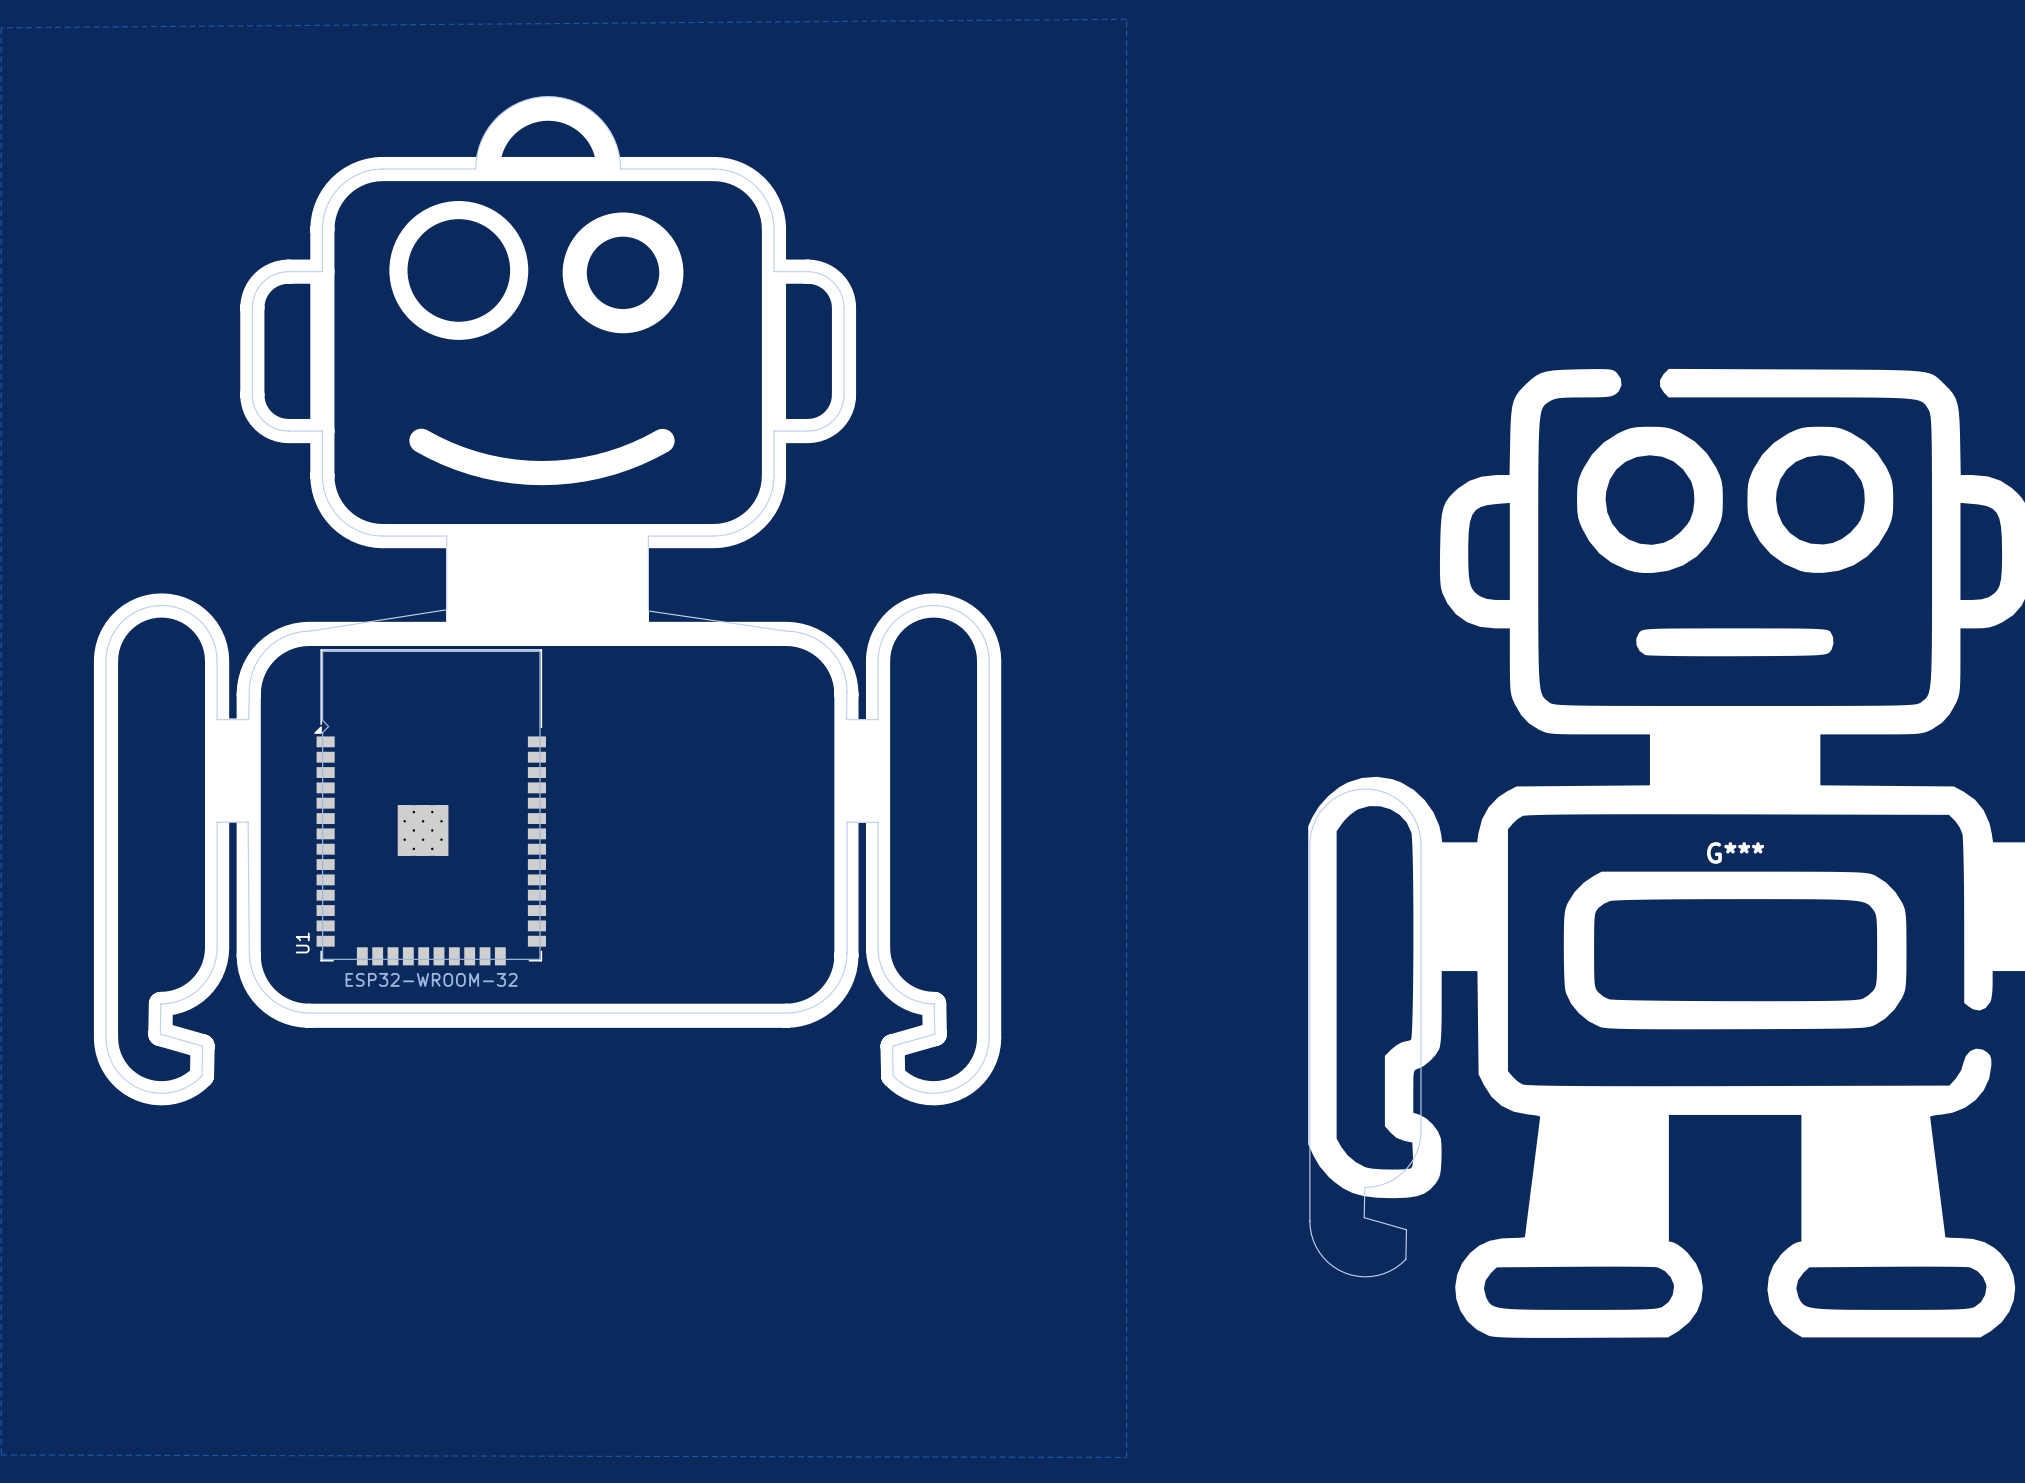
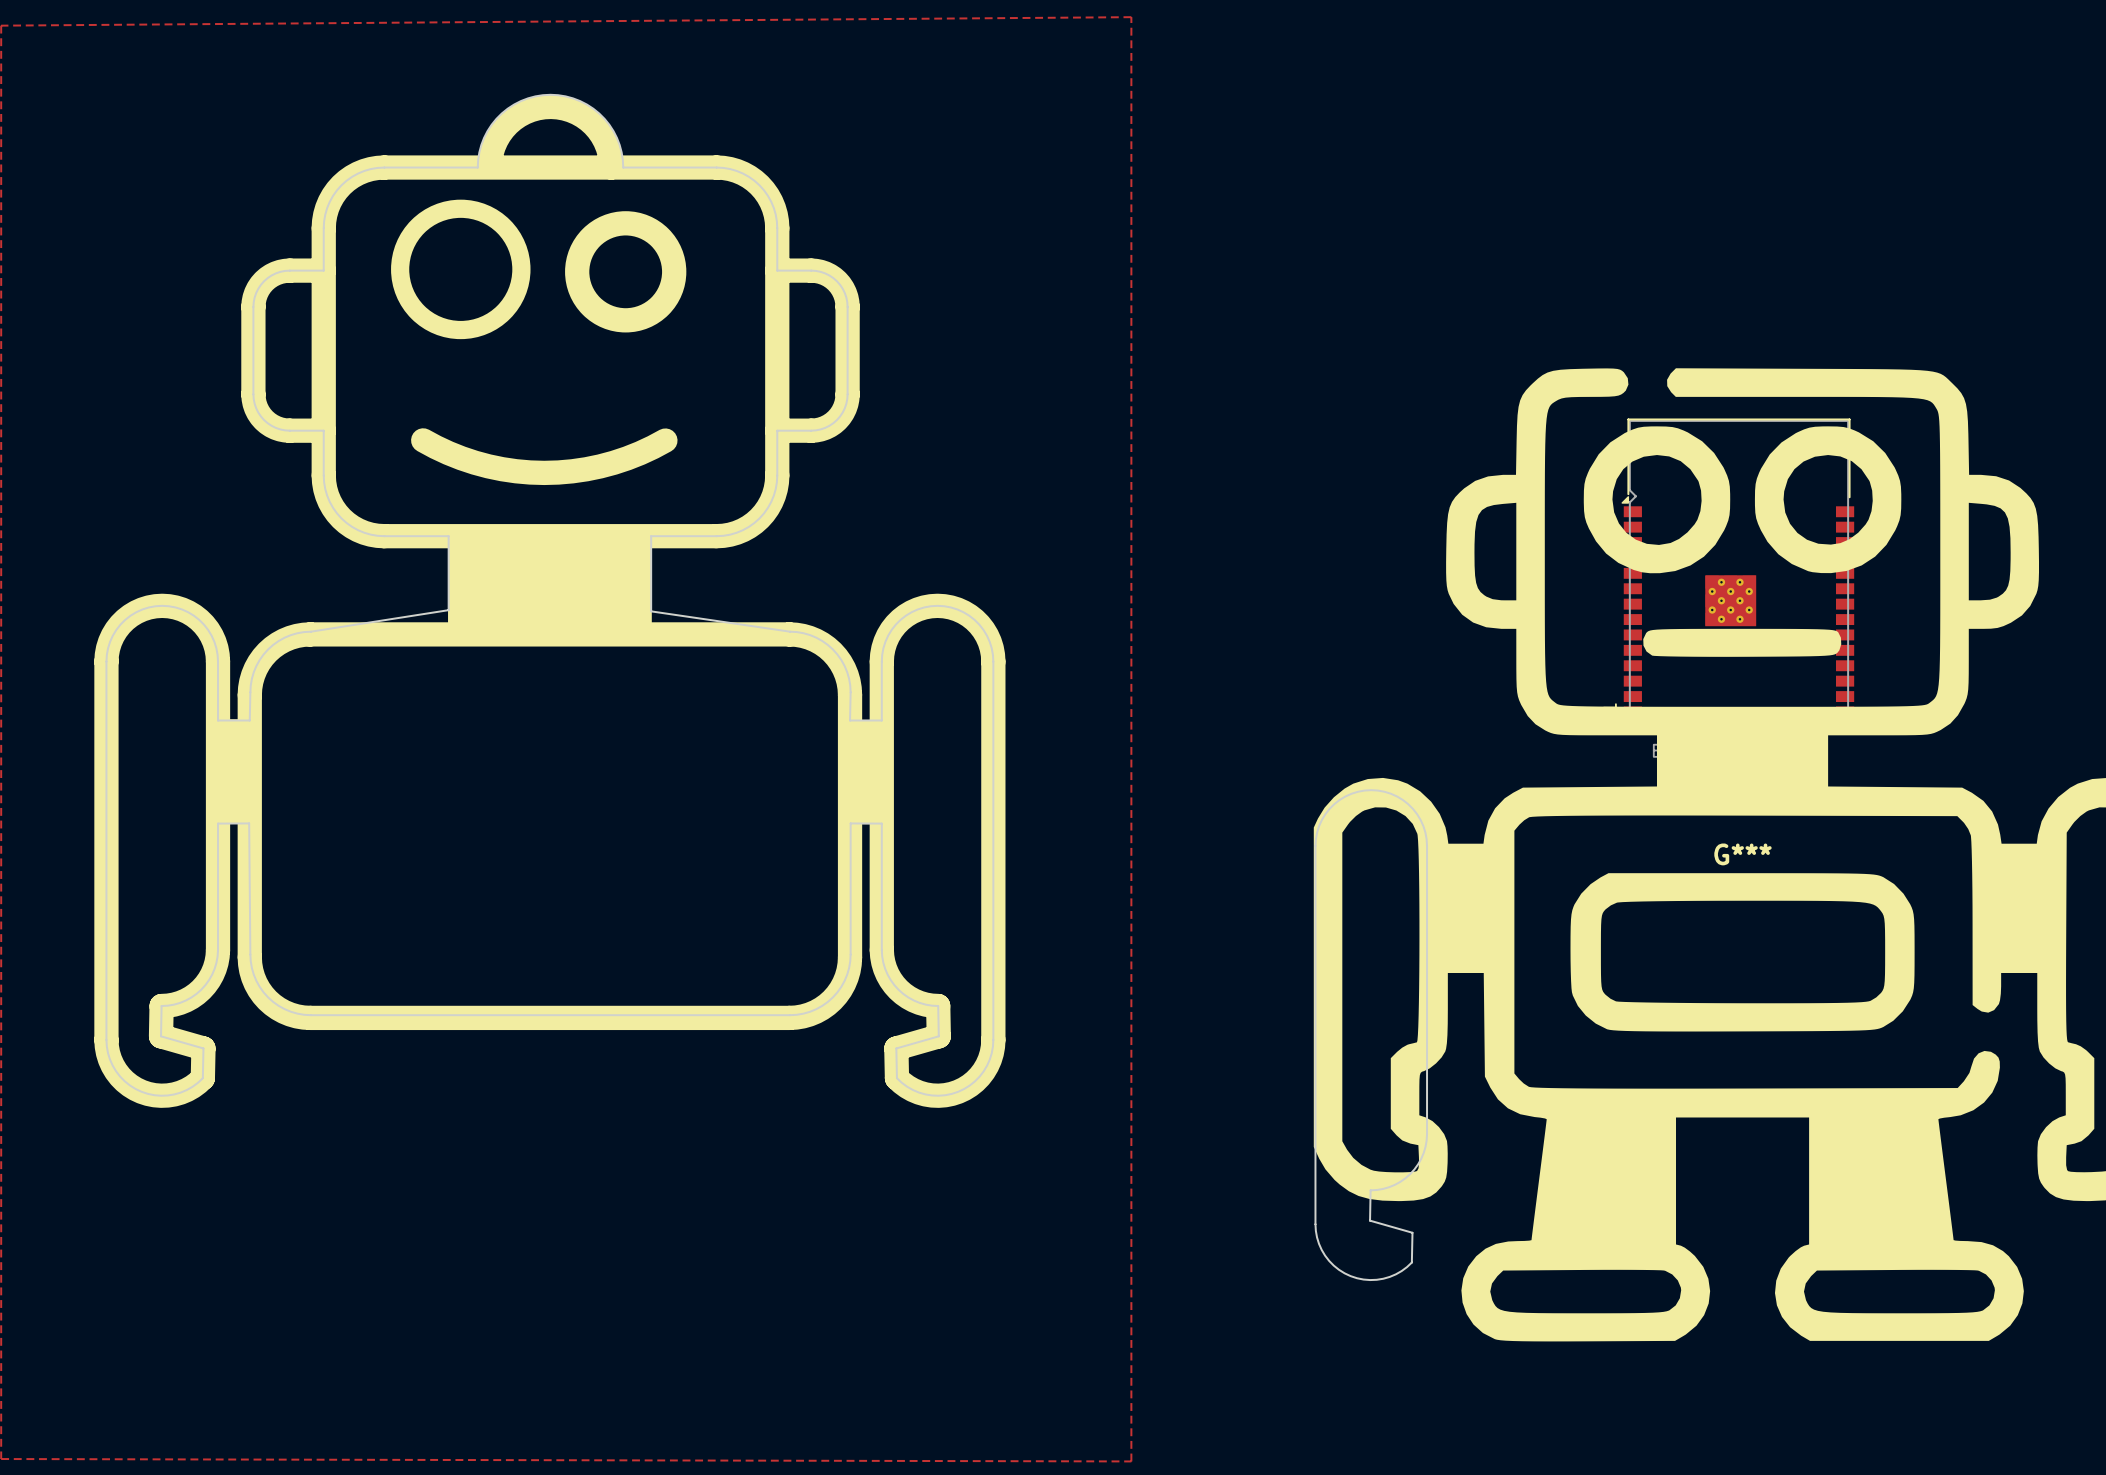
U1 position: (430, 807) -> (1737, 577)

